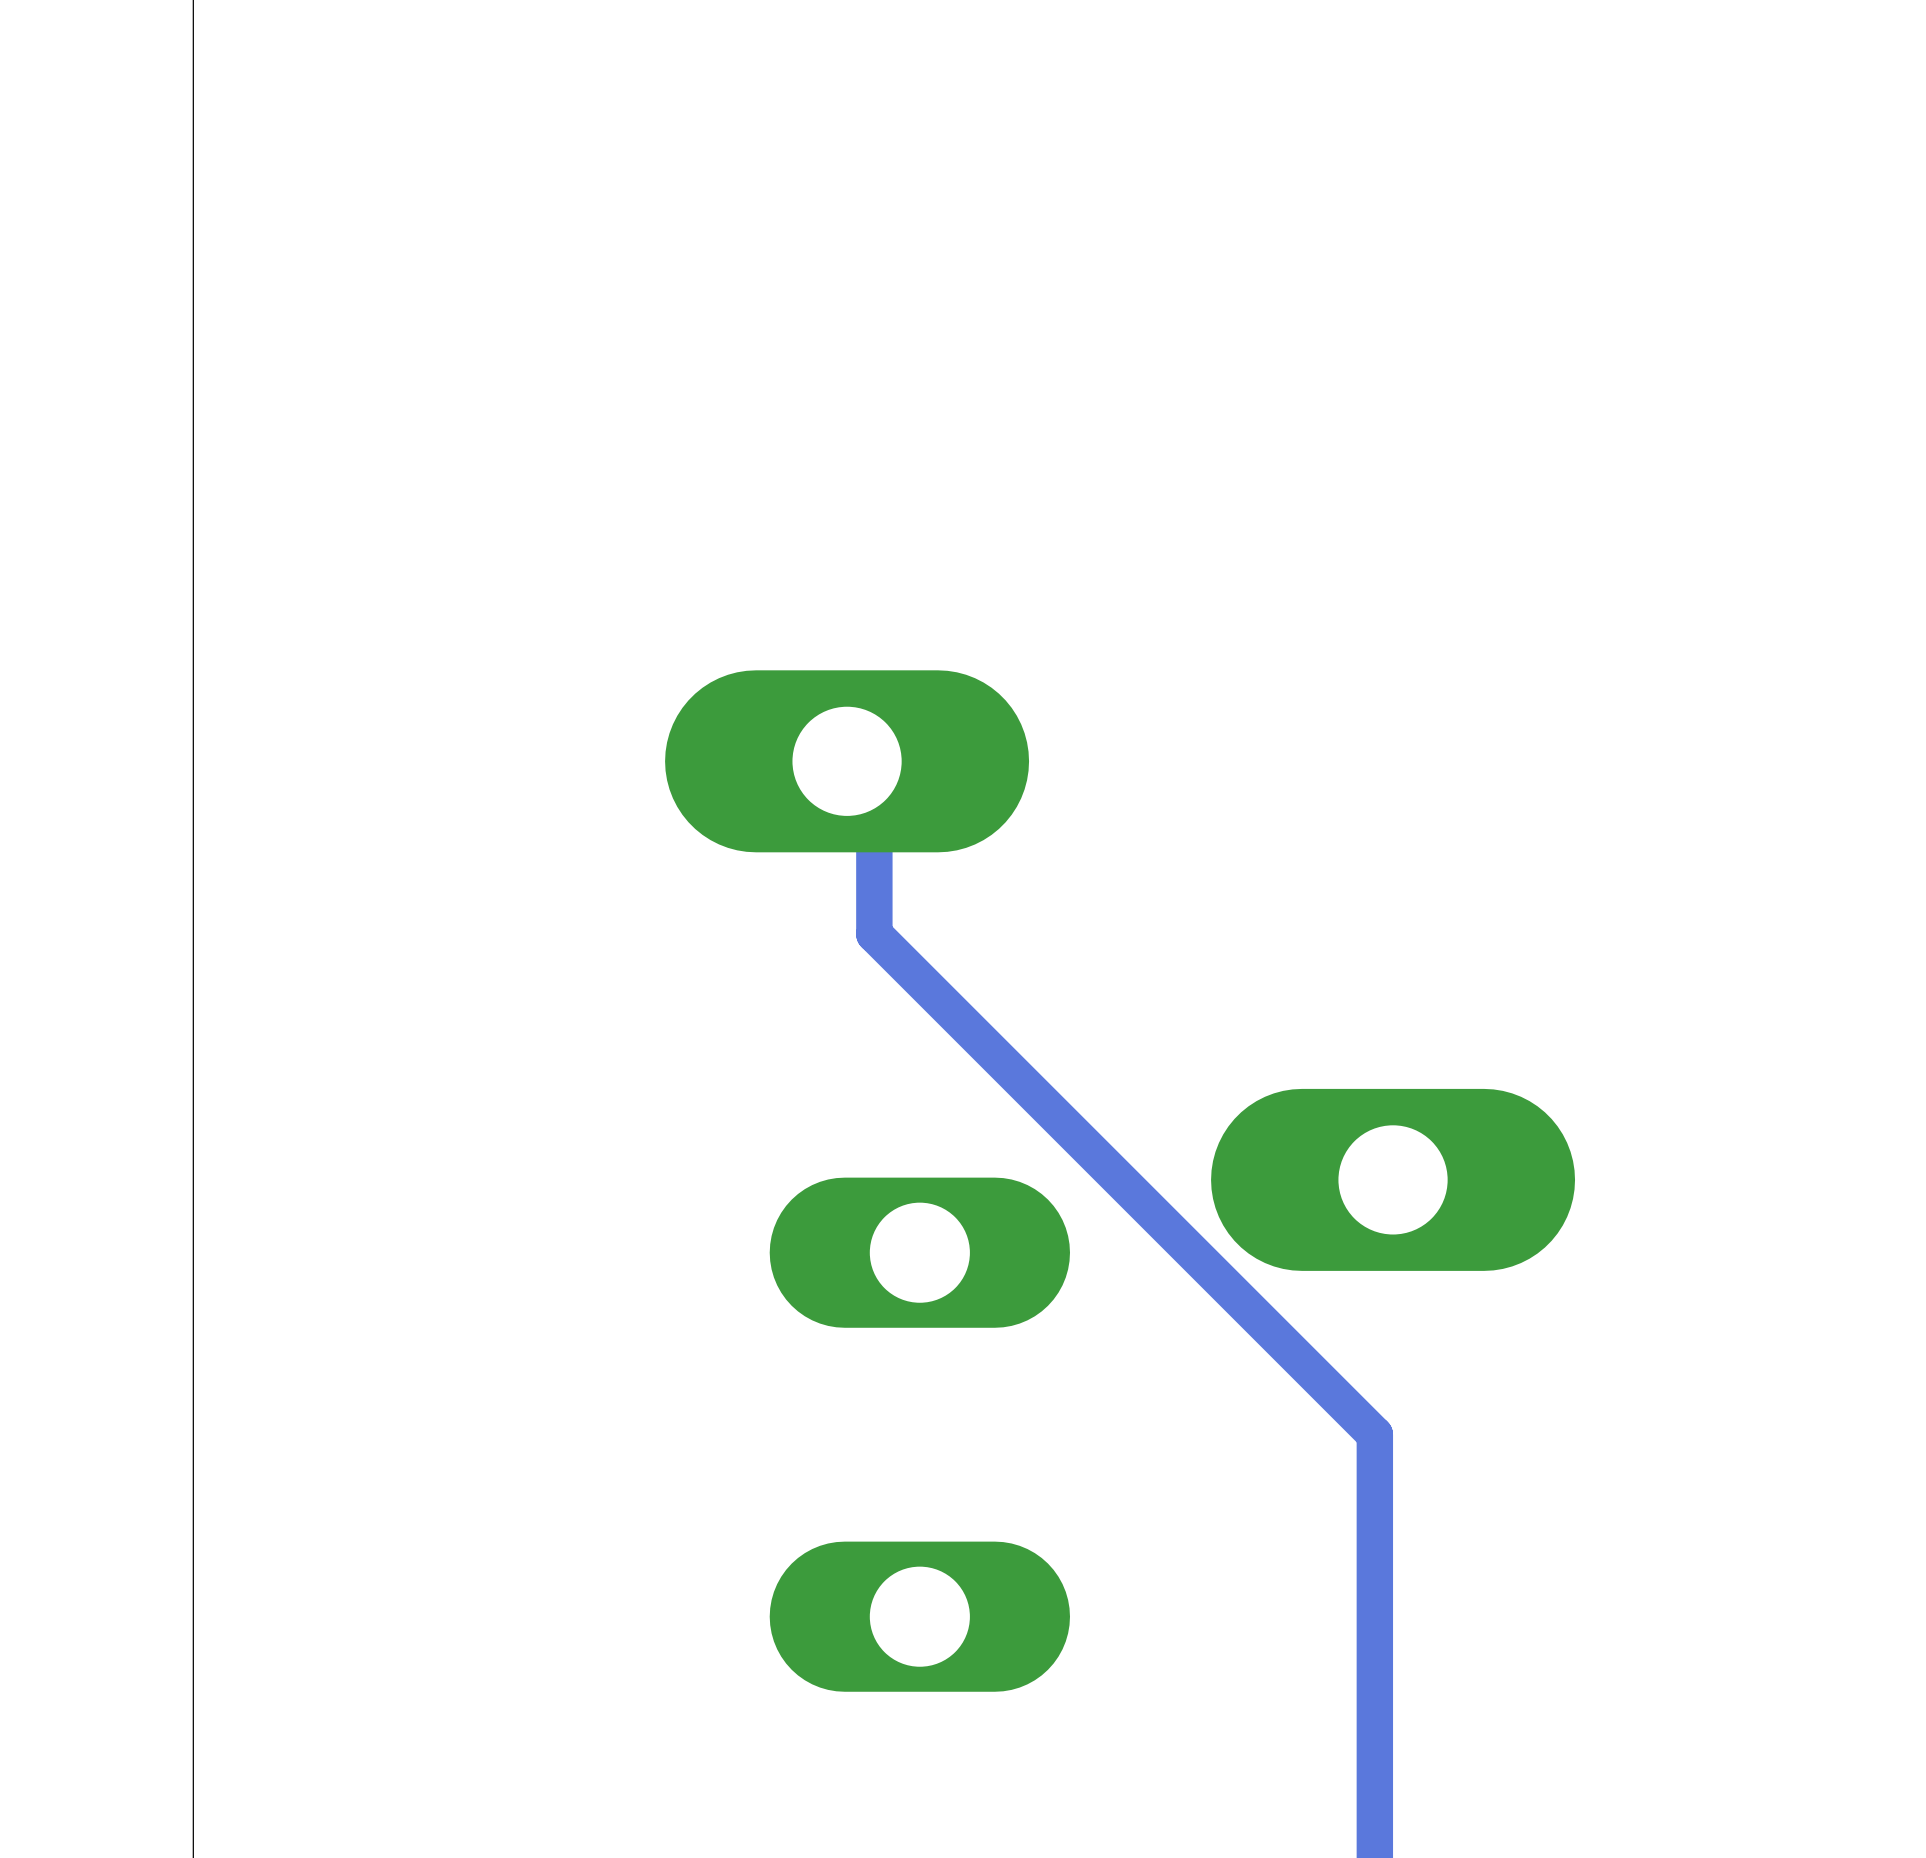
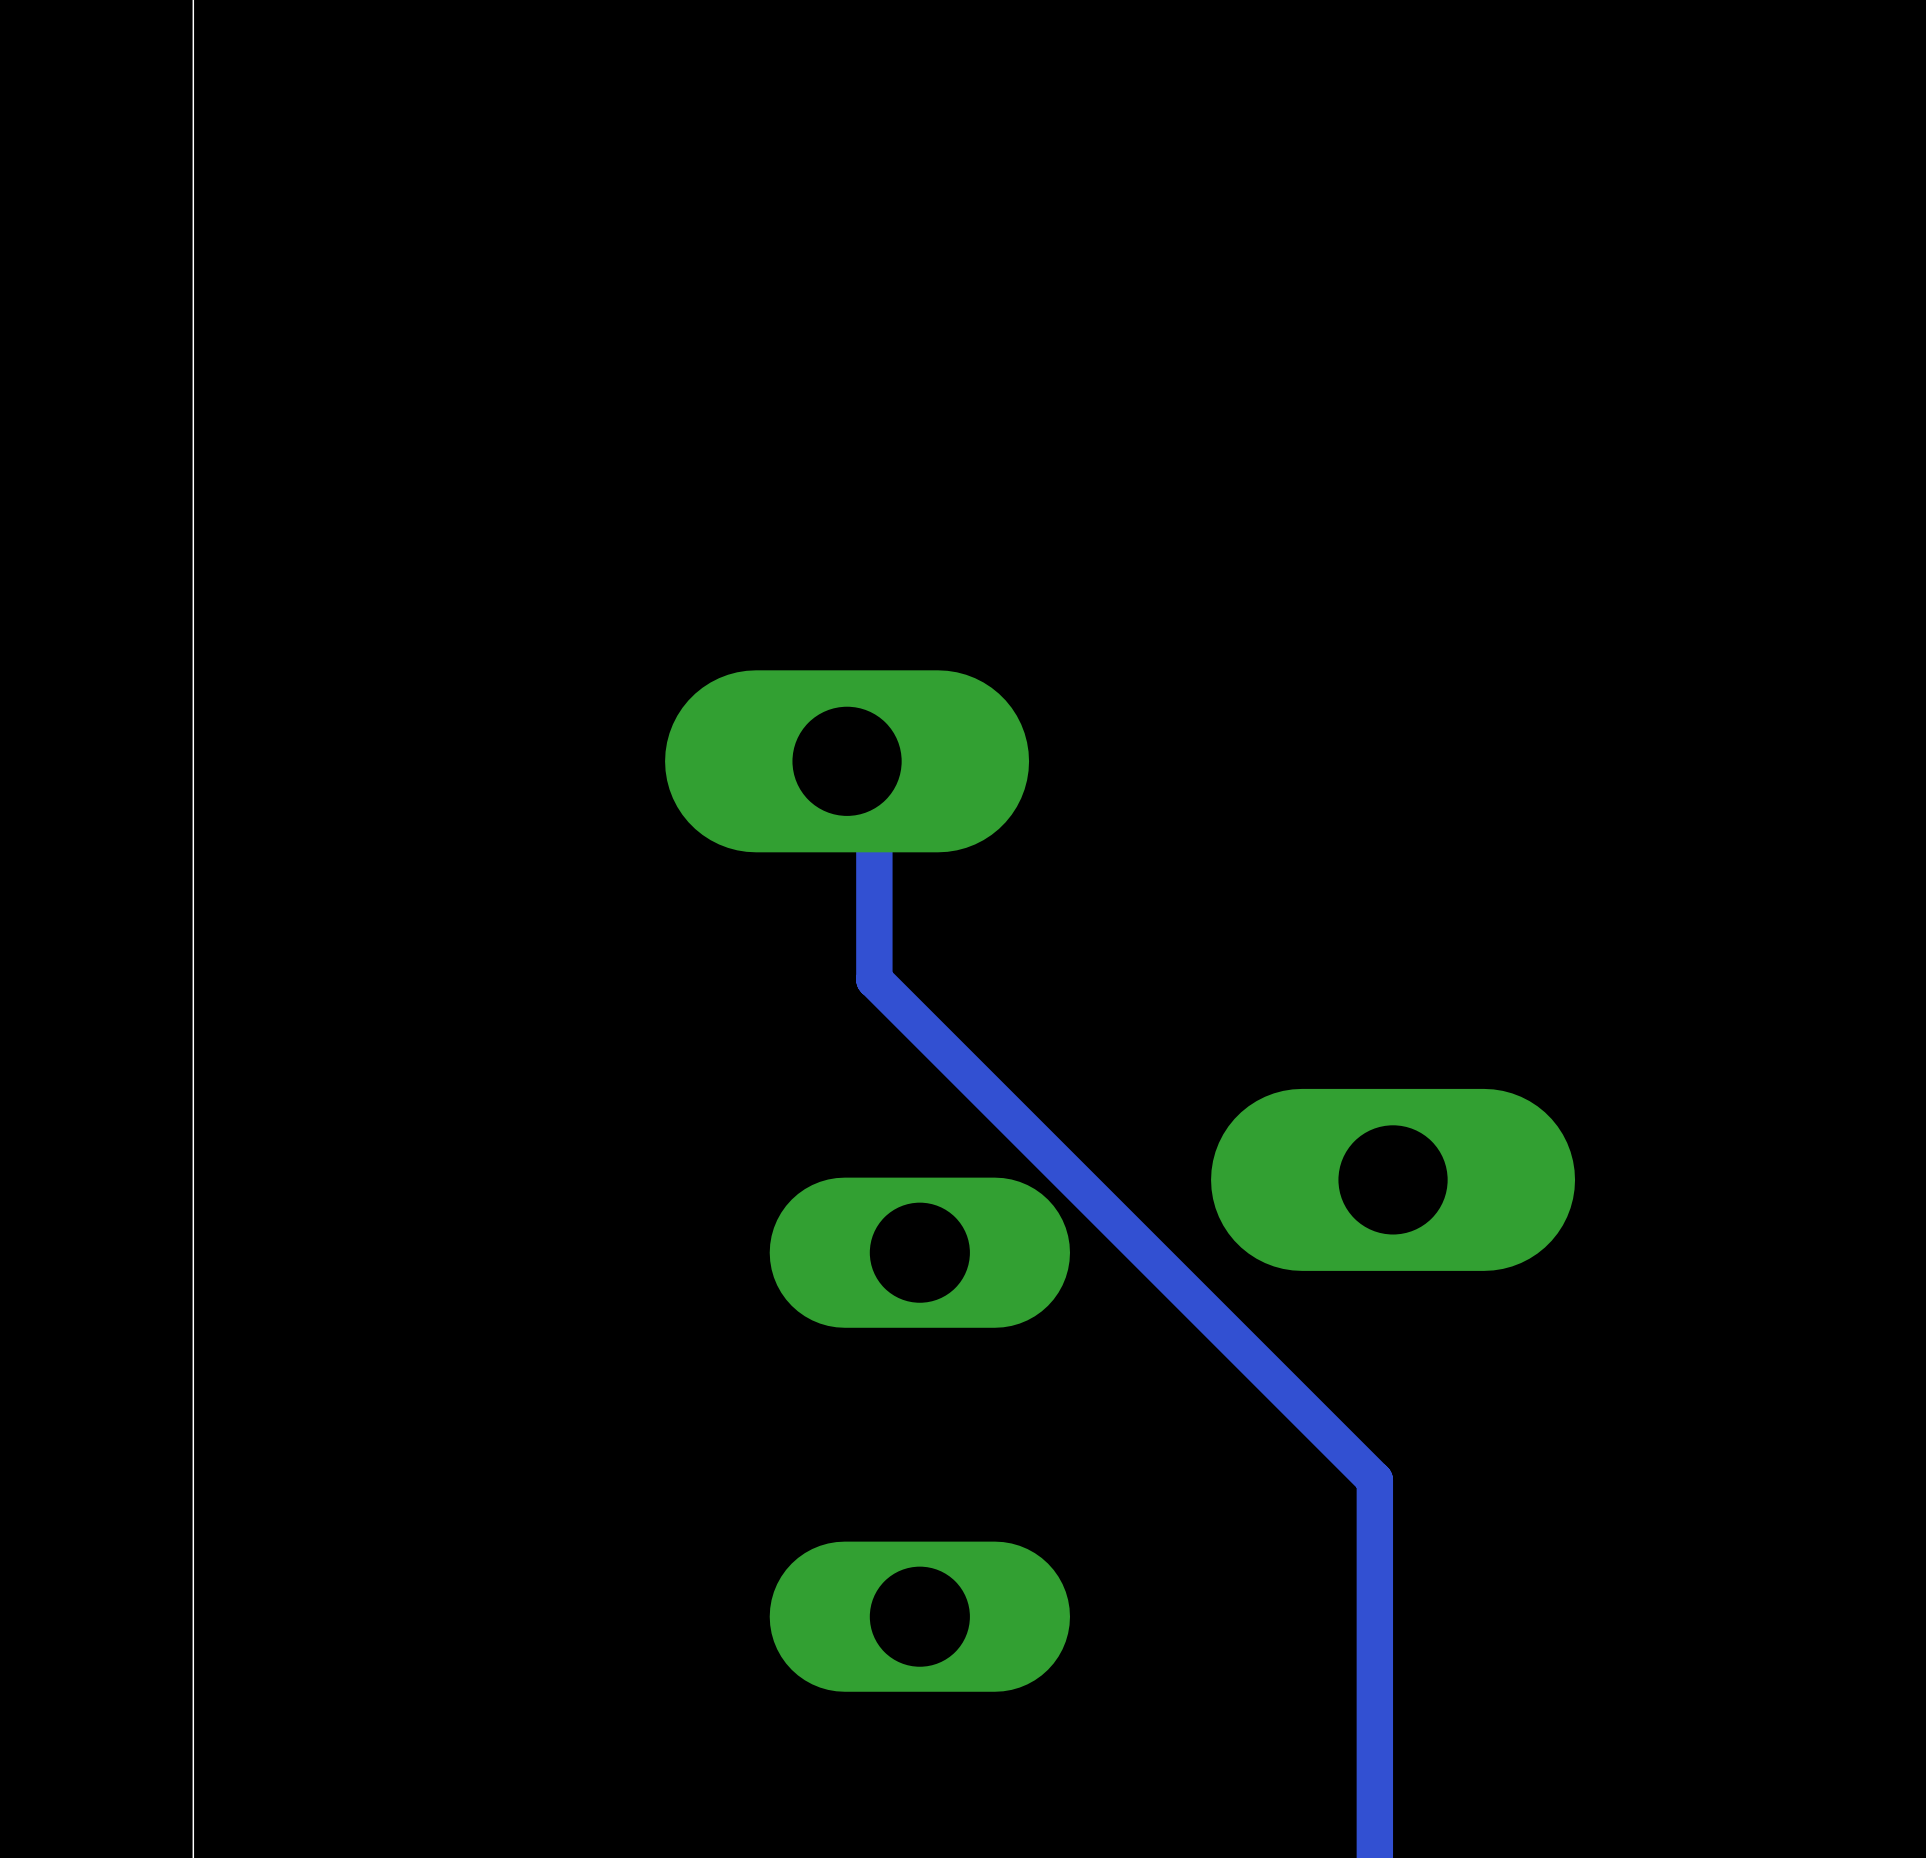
track: (874, 934) (1374, 1434) (1374, 1480) -> (874, 934) (874, 979) (1374, 1480)

